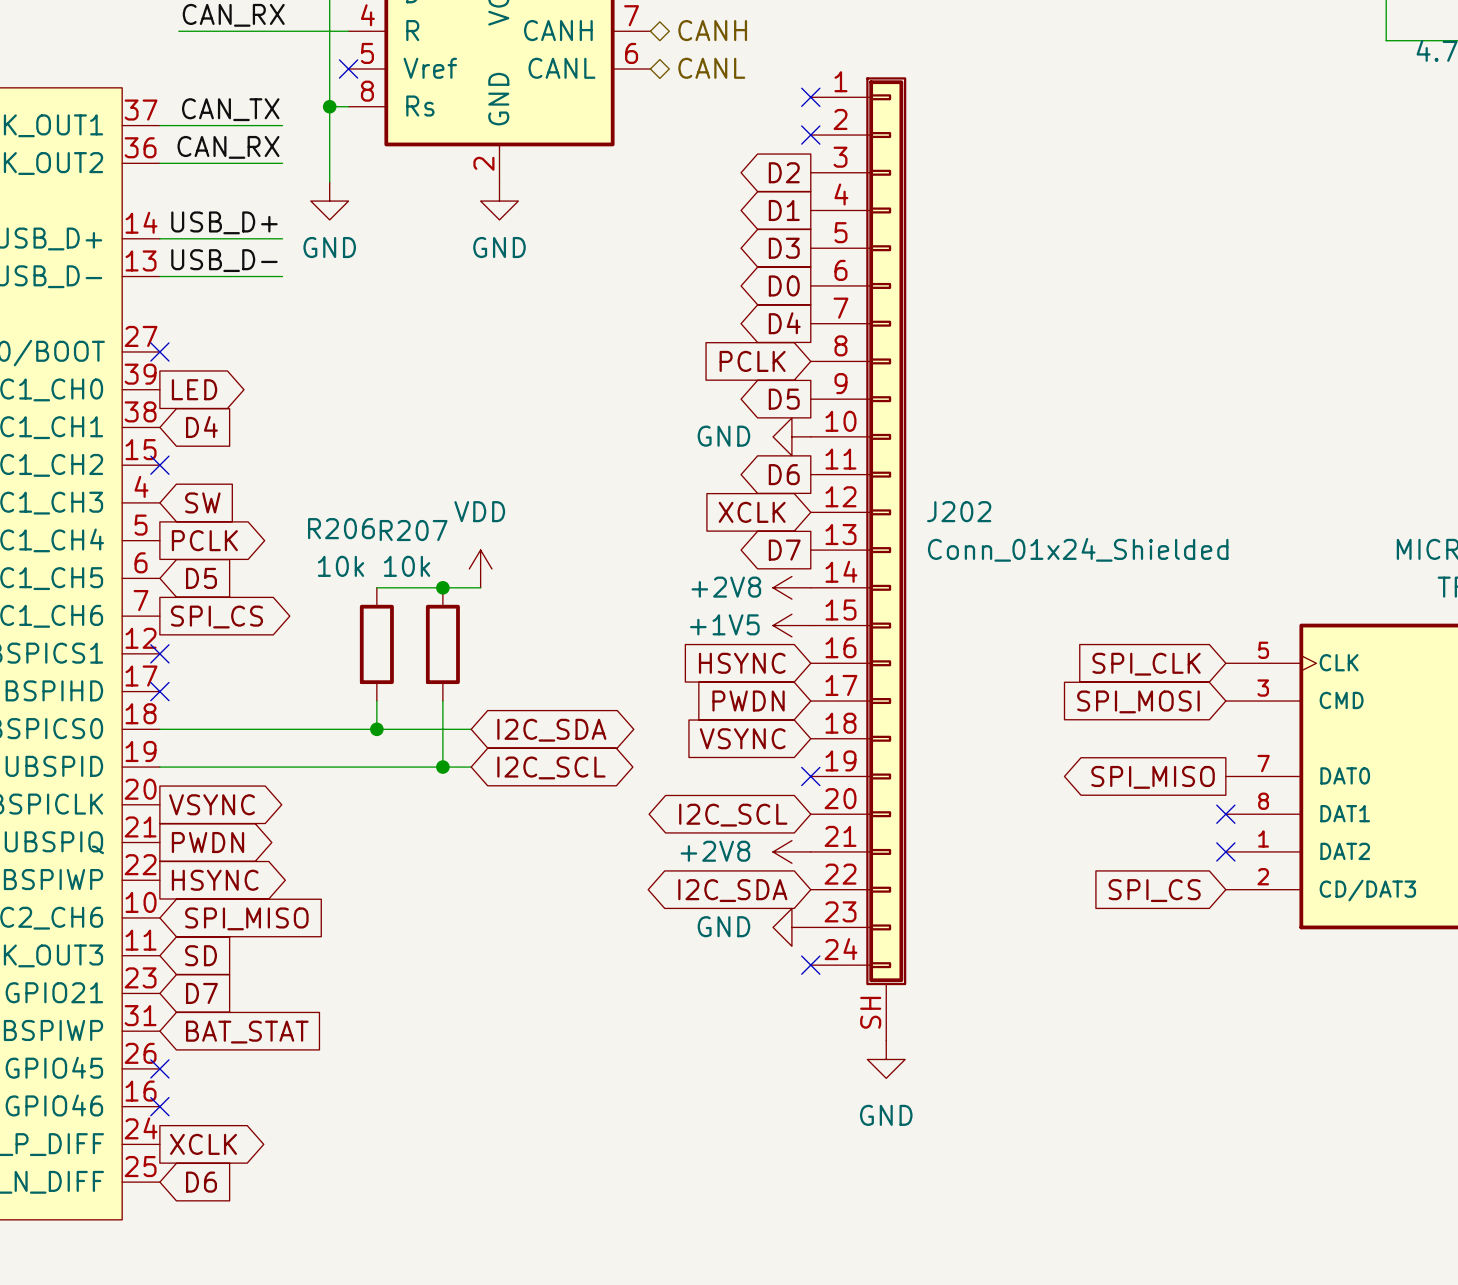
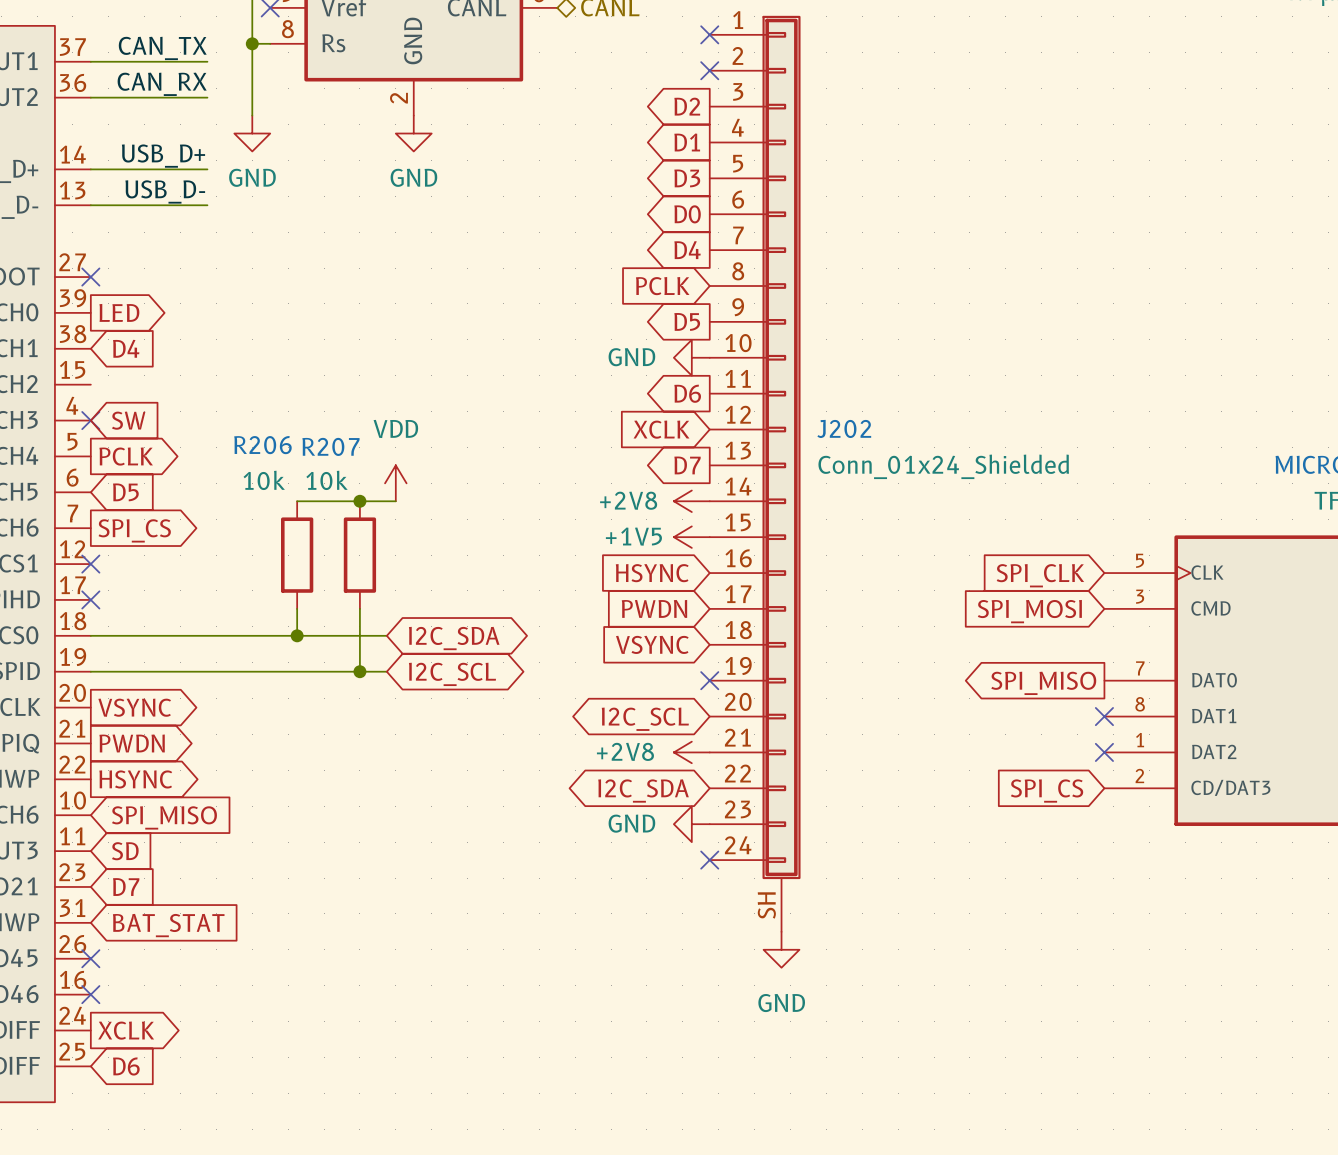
no-connect mark position: (159, 465) -> (90, 420)

